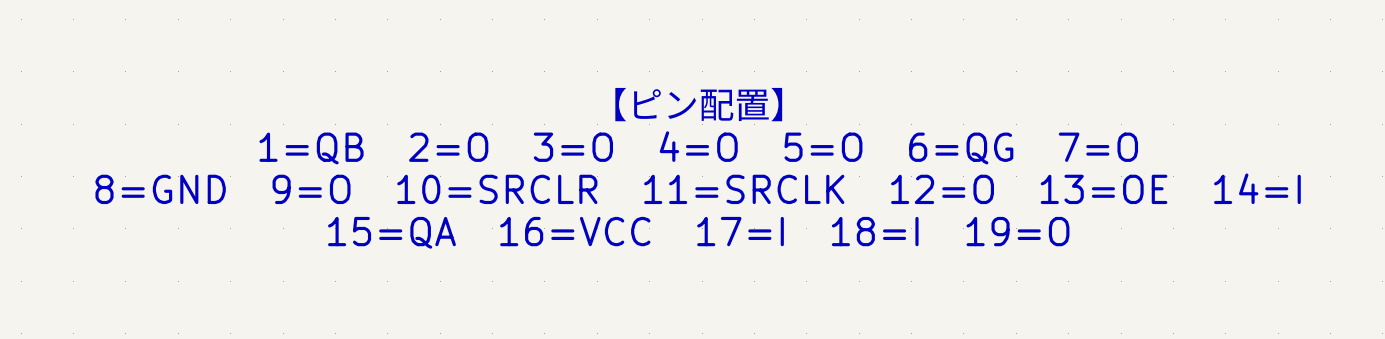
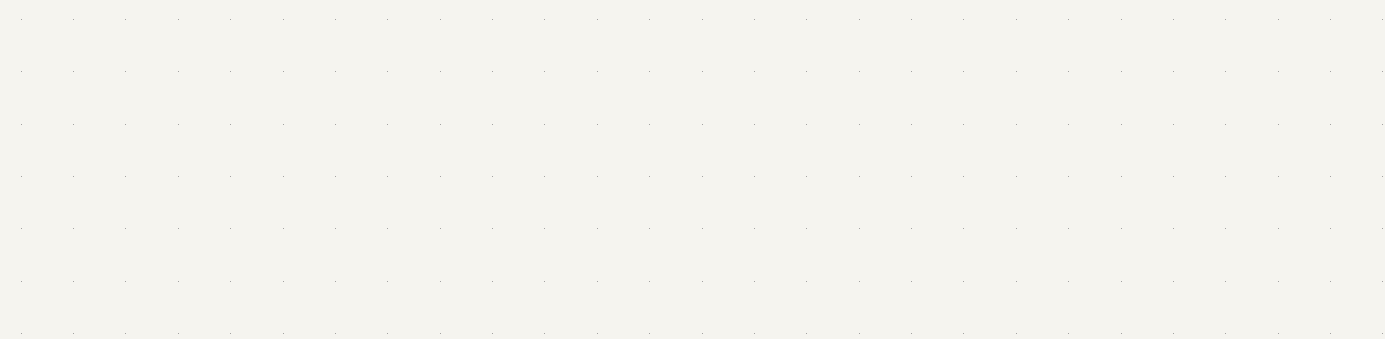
text: 【ピン配置】 (698, 104) -> none
text: 1=QB 2=O 3=O 4=O 5=O 6=QG 7=O (698, 147) -> none
text: 8=GND 9=O 10=SRCLR 11=SRCLK 12=O 13=OE 14=I (698, 188) -> none
text: 15=QA 16=VCC 17=I 18=I 19=O (698, 232) -> none

